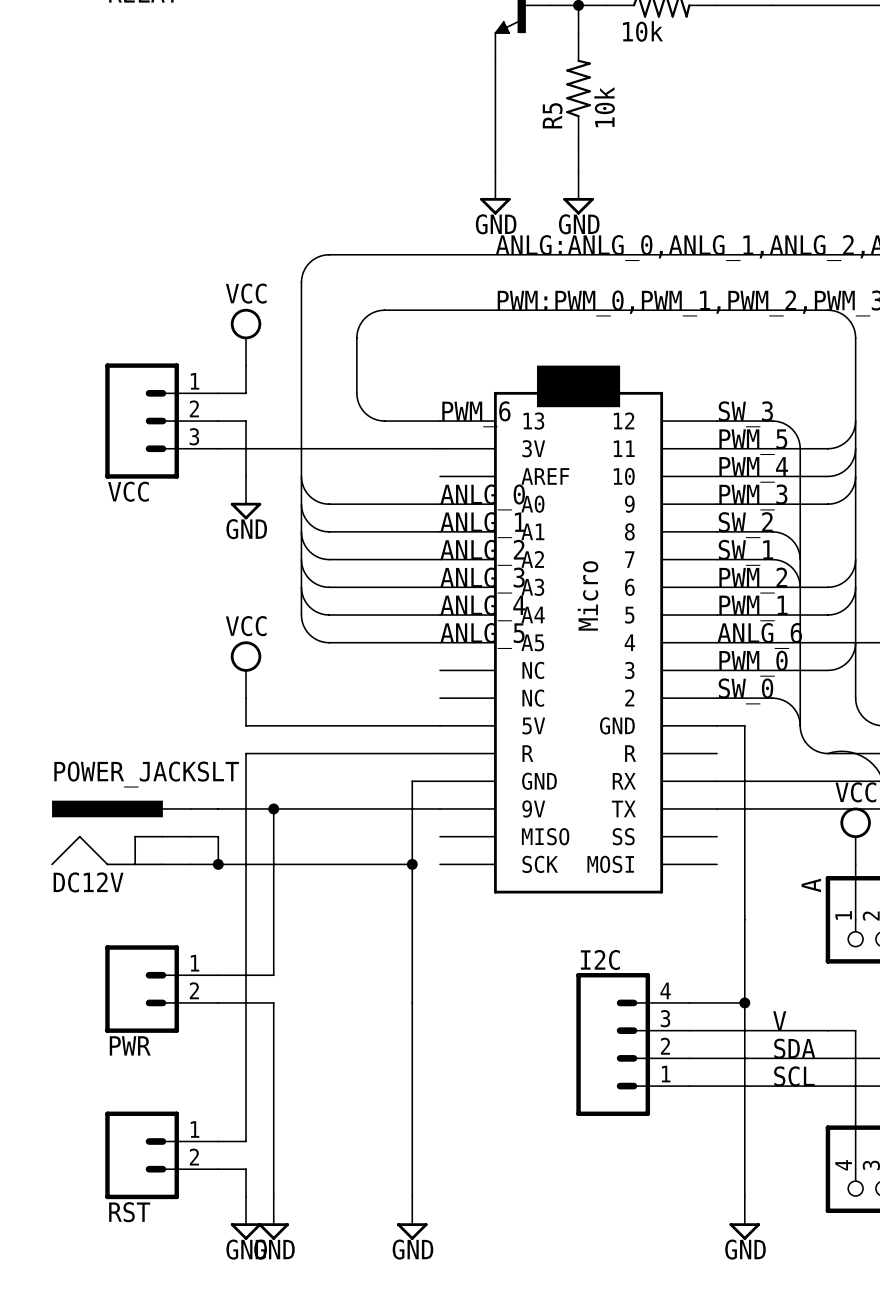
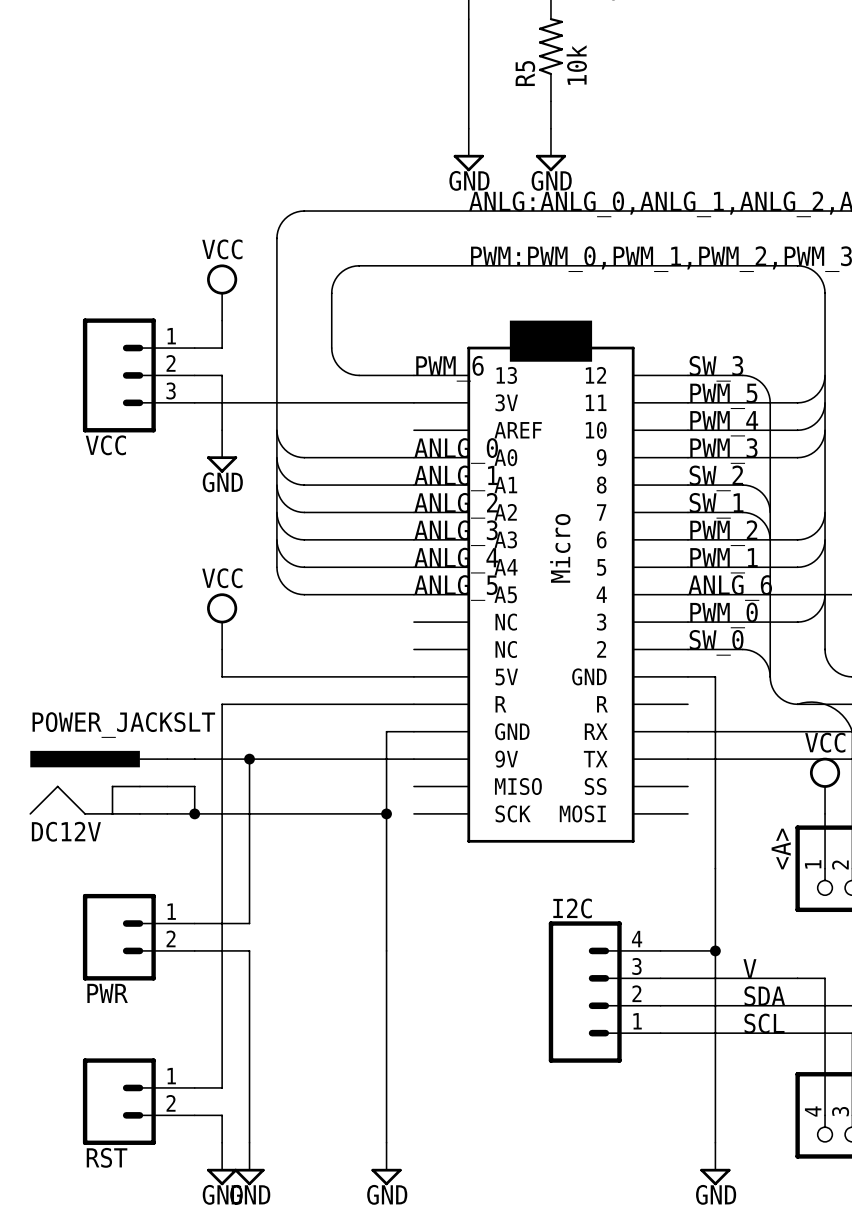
A name: A (811, 885) -> <A> (781, 849)

